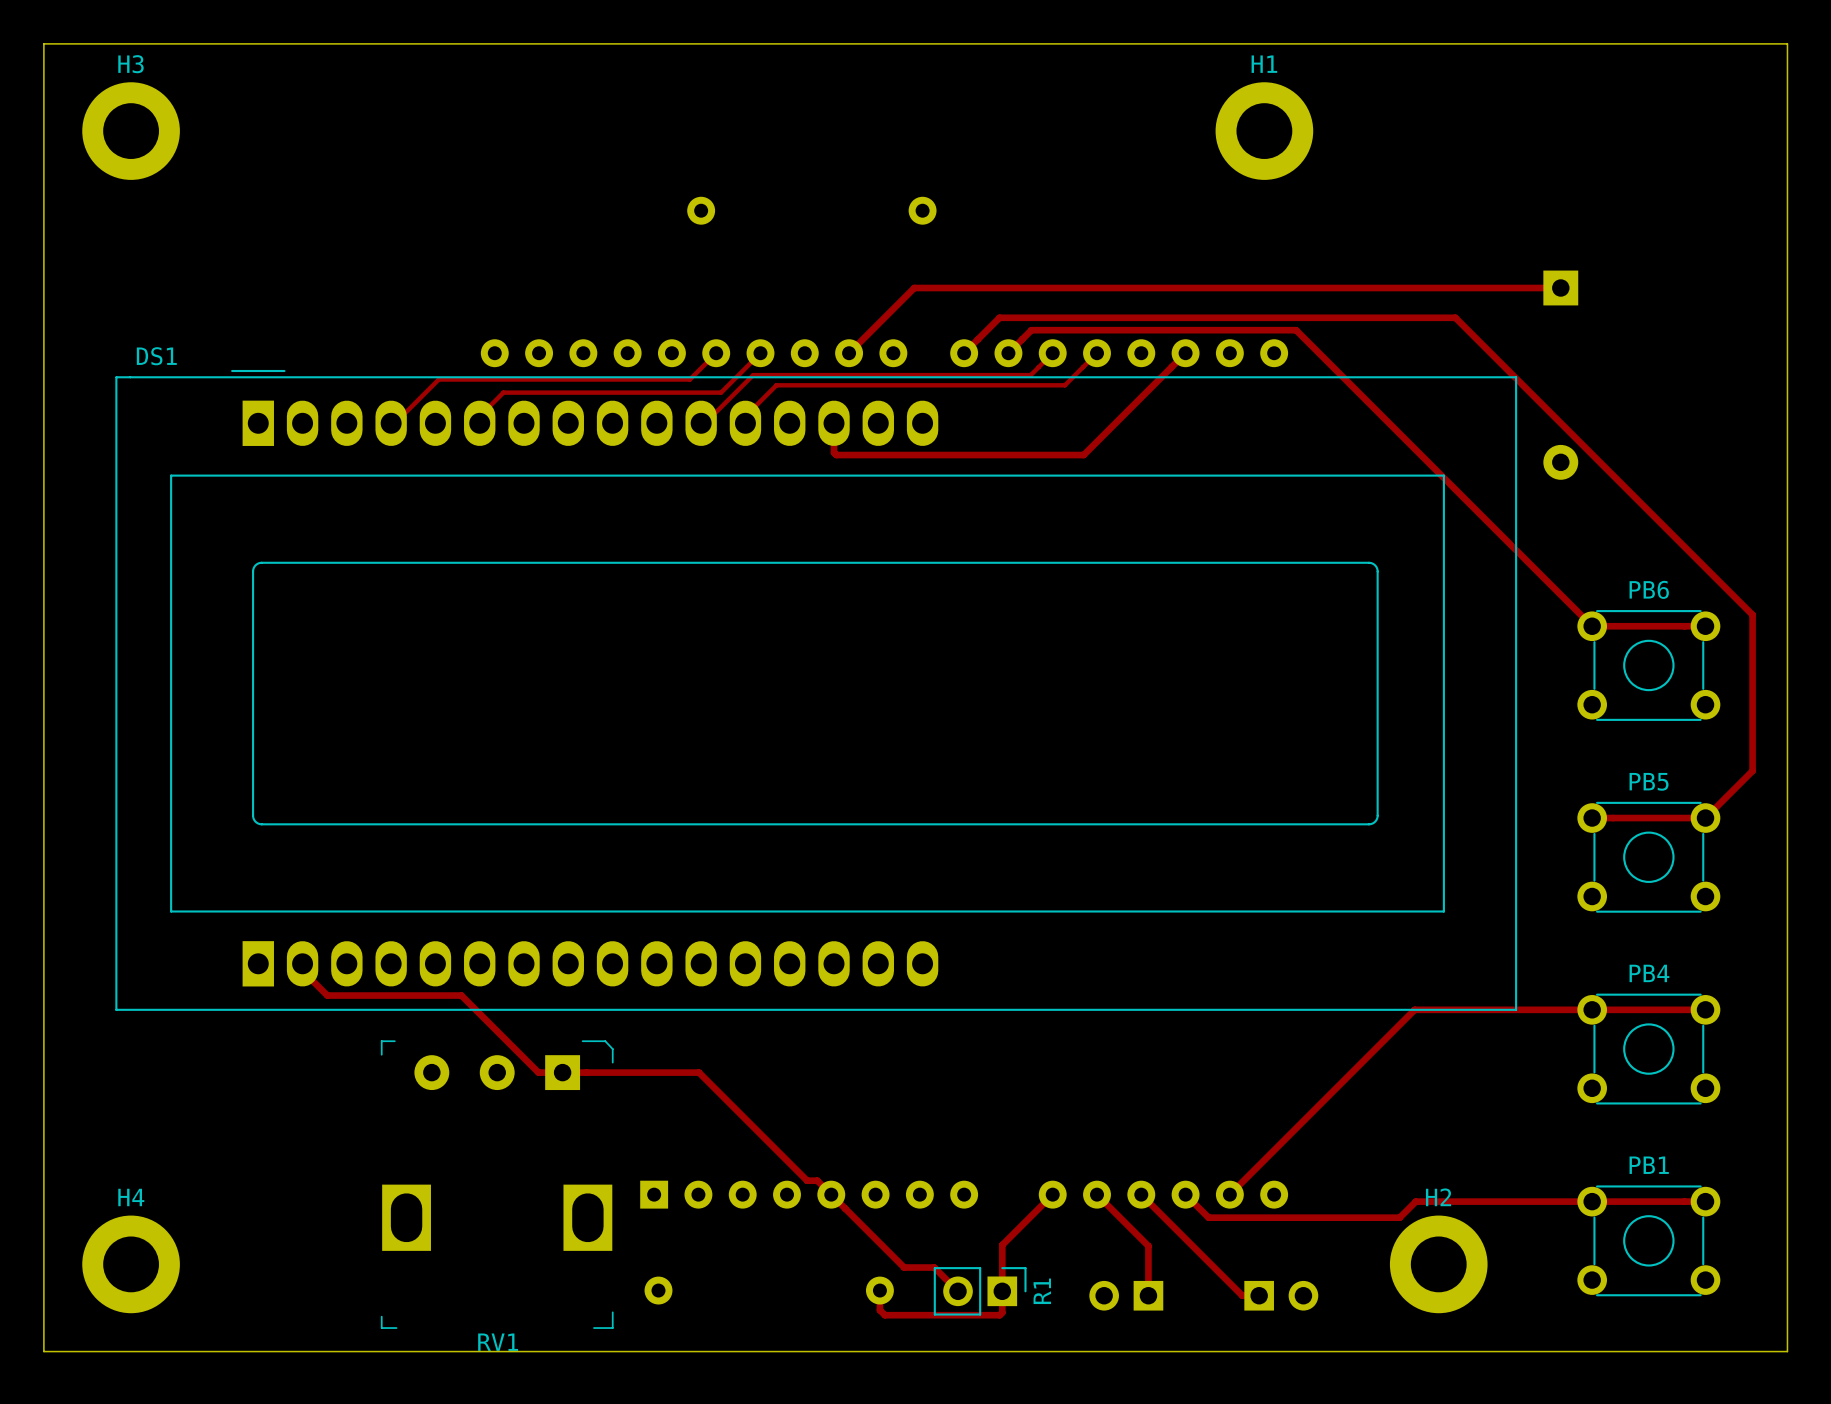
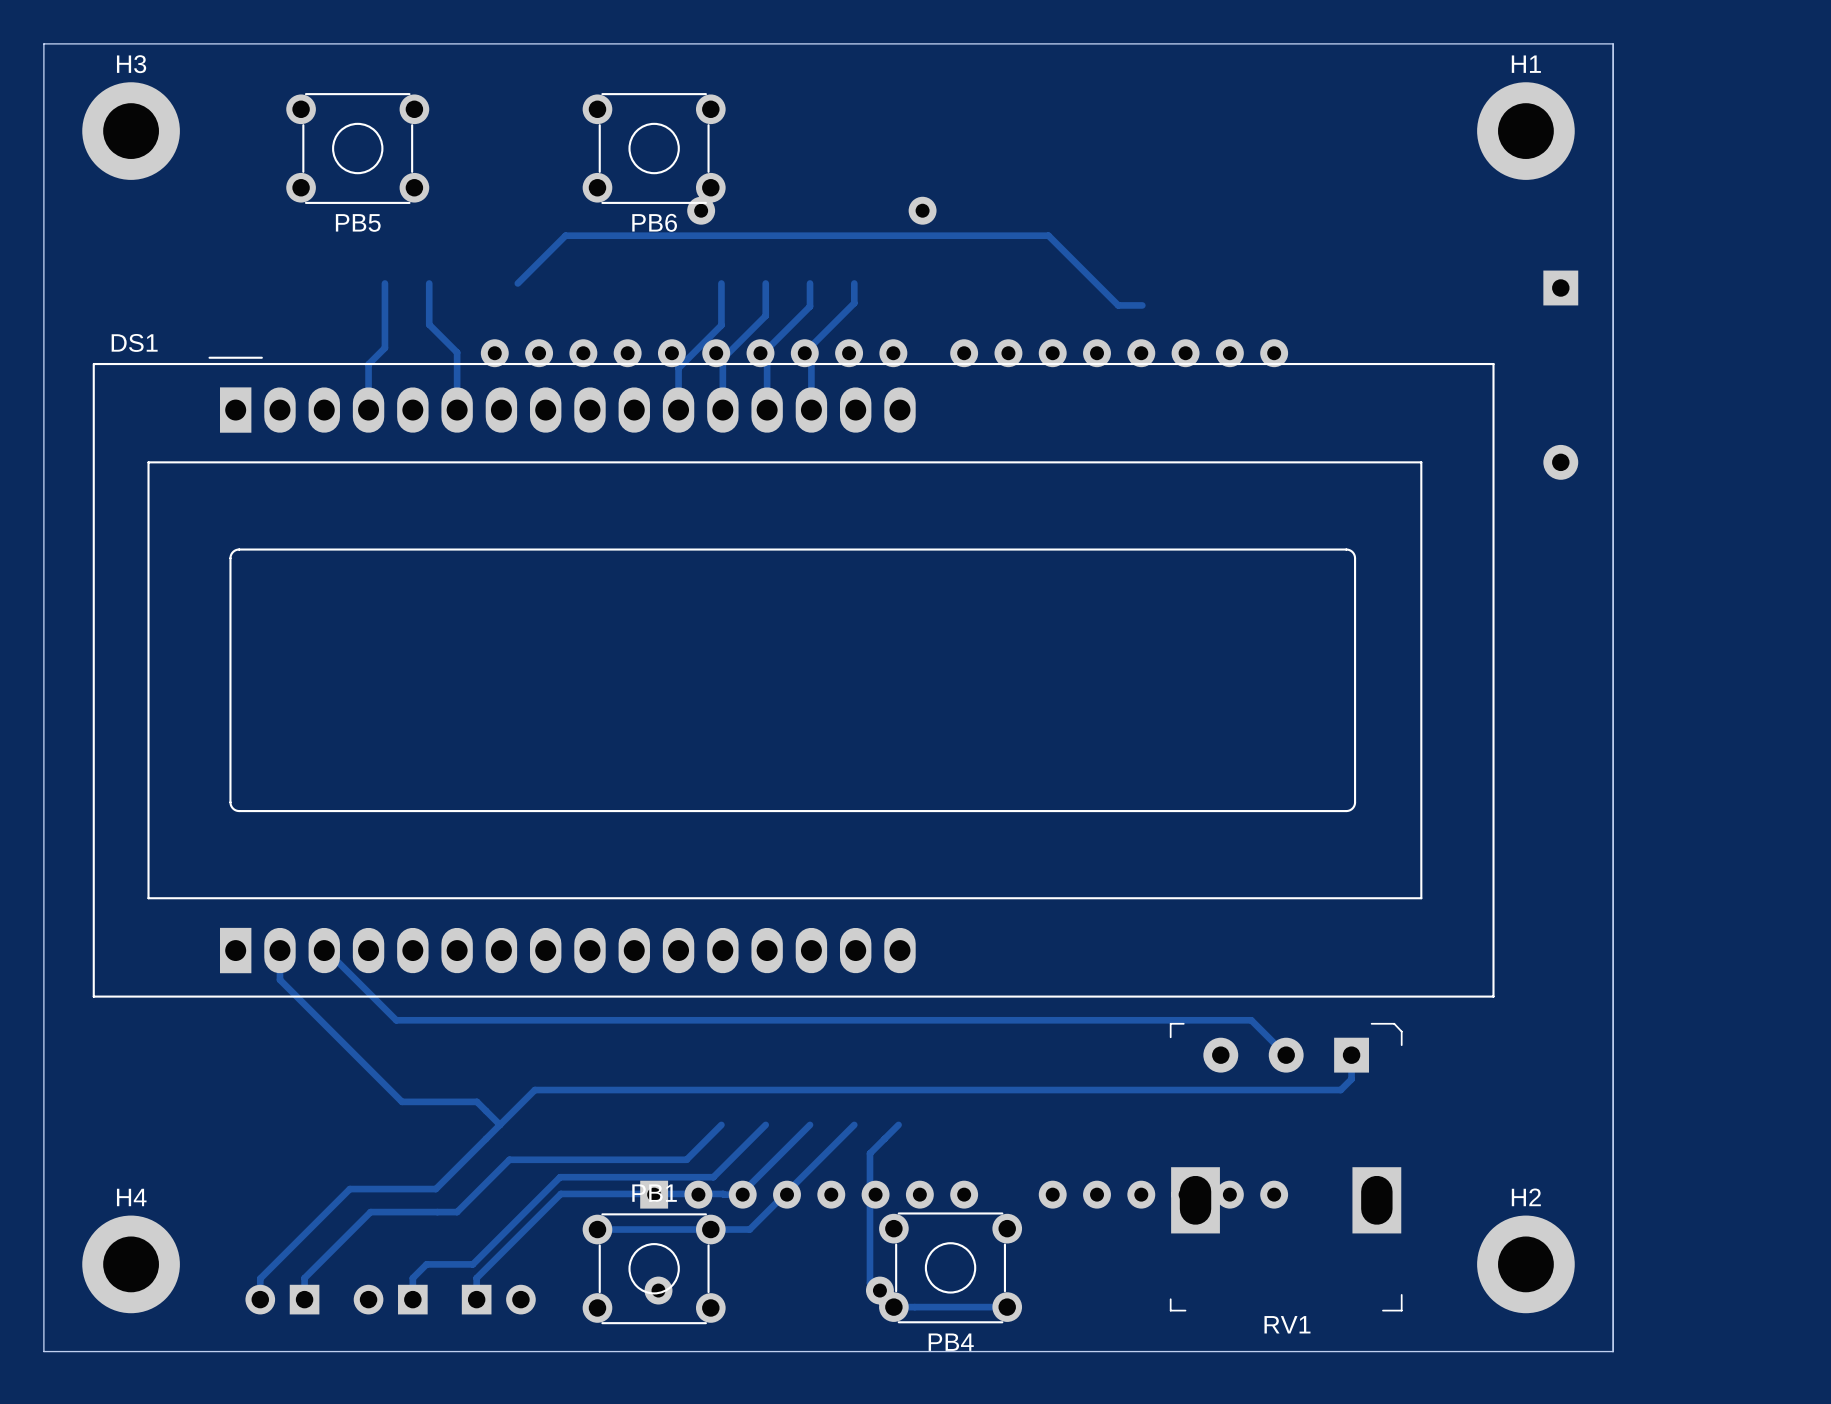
board edge: (1613, 43) (1787, 43) (1787, 1351) (1613, 1351) -> (1613, 43) (1613, 1351)
H1 position: (1264, 131) -> (1525, 131)
track: none -> (384, 283) (384, 347) (368, 364) (368, 410)
track: none -> (429, 283) (429, 324) (457, 352) (457, 410)
track: none -> (517, 283) (565, 235) (1048, 235) (1118, 305) (1142, 305)
track: none -> (721, 283) (721, 325) (678, 368) (678, 410)
track: none -> (765, 283) (765, 315) (722, 358) (722, 410)
track: none -> (810, 283) (810, 306) (767, 349) (767, 410)
track: none -> (854, 283) (854, 303) (811, 346) (811, 410)
track: (1560, 288) (914, 288) (849, 353) -> none
track: (716, 353) (689, 379) (438, 379) (395, 423) (391, 423) -> none
track: (760, 353) (721, 392) (503, 392) (479, 416) (479, 423) -> none
track: (964, 353) (999, 317) (1455, 317) (1752, 614) (1752, 770) (1705, 818) (1592, 818) -> none
track: (1008, 353) (1031, 330) (1296, 330) (1592, 626) (1705, 626) -> none
track: (1052, 353) (1030, 375) (753, 375) (705, 423) (701, 423) -> none
track: (1097, 353) (1064, 385) (776, 385) (745, 416) (745, 423) -> none
track: (1185, 353) (1083, 455) (836, 455) (834, 452) (834, 423) -> none
PB6 name position: PB6 (1649, 589) -> PB6 (654, 222)
PB6 position: (1648, 665) -> (654, 148)
DS1 position: (816, 690) -> (793, 677)
PB5 name position: PB5 (1649, 781) -> PB5 (358, 222)
PB5 position: (1648, 857) -> (357, 148)
track: none -> (279, 950) (279, 979) (402, 1101) (476, 1101) (500, 1124)
track: none -> (324, 950) (326, 950) (396, 1020) (1251, 1020) (1286, 1055)
track: (302, 963) (302, 970) (327, 995) (461, 995) (538, 1072) (699, 1072) (807, 1180) (817, 1180) (904, 1267) (934, 1267) (958, 1291) -> none
PB4 name position: PB4 (1649, 973) -> PB4 (951, 1342)
track: (1705, 1009) (1414, 1009) (1229, 1194) -> none
PB4 position: (1648, 1049) -> (950, 1267)
track: none -> (1351, 1055) (1351, 1079) (1340, 1090) (534, 1090) (435, 1189) (349, 1189) (260, 1278) (260, 1299)
track: none -> (721, 1124) (686, 1159) (509, 1159) (457, 1212) (370, 1212) (304, 1278) (304, 1299)
track: none -> (765, 1124) (713, 1177) (560, 1177) (472, 1264) (426, 1264) (412, 1278) (412, 1299)
track: none -> (810, 1124) (740, 1194) (560, 1193) (476, 1278) (476, 1299)
track: none -> (854, 1124) (749, 1229) (597, 1229)
track: none -> (898, 1124) (869, 1153) (869, 1283) (893, 1307) (1007, 1307)
RV1 position: (497, 1184) -> (1286, 1167)
track: (1052, 1194) (1002, 1245) (1002, 1312) (999, 1315) (884, 1315) (879, 1310) (879, 1290) -> none
track: (1097, 1194) (1148, 1246) (1148, 1295) -> none
track: (1141, 1194) (1242, 1295) (1259, 1295) -> none
track: (1185, 1194) (1208, 1217) (1399, 1217) (1415, 1201) (1705, 1201) -> none
PB1 position: (1648, 1240) -> (654, 1268)
H2 position: (1438, 1264) -> (1525, 1264)
R1: (980, 1291) -> none
part: (1126, 1295) -> none
part: (1281, 1295) -> none
part: none -> (282, 1299)
part: none -> (390, 1299)
part: none -> (498, 1299)

